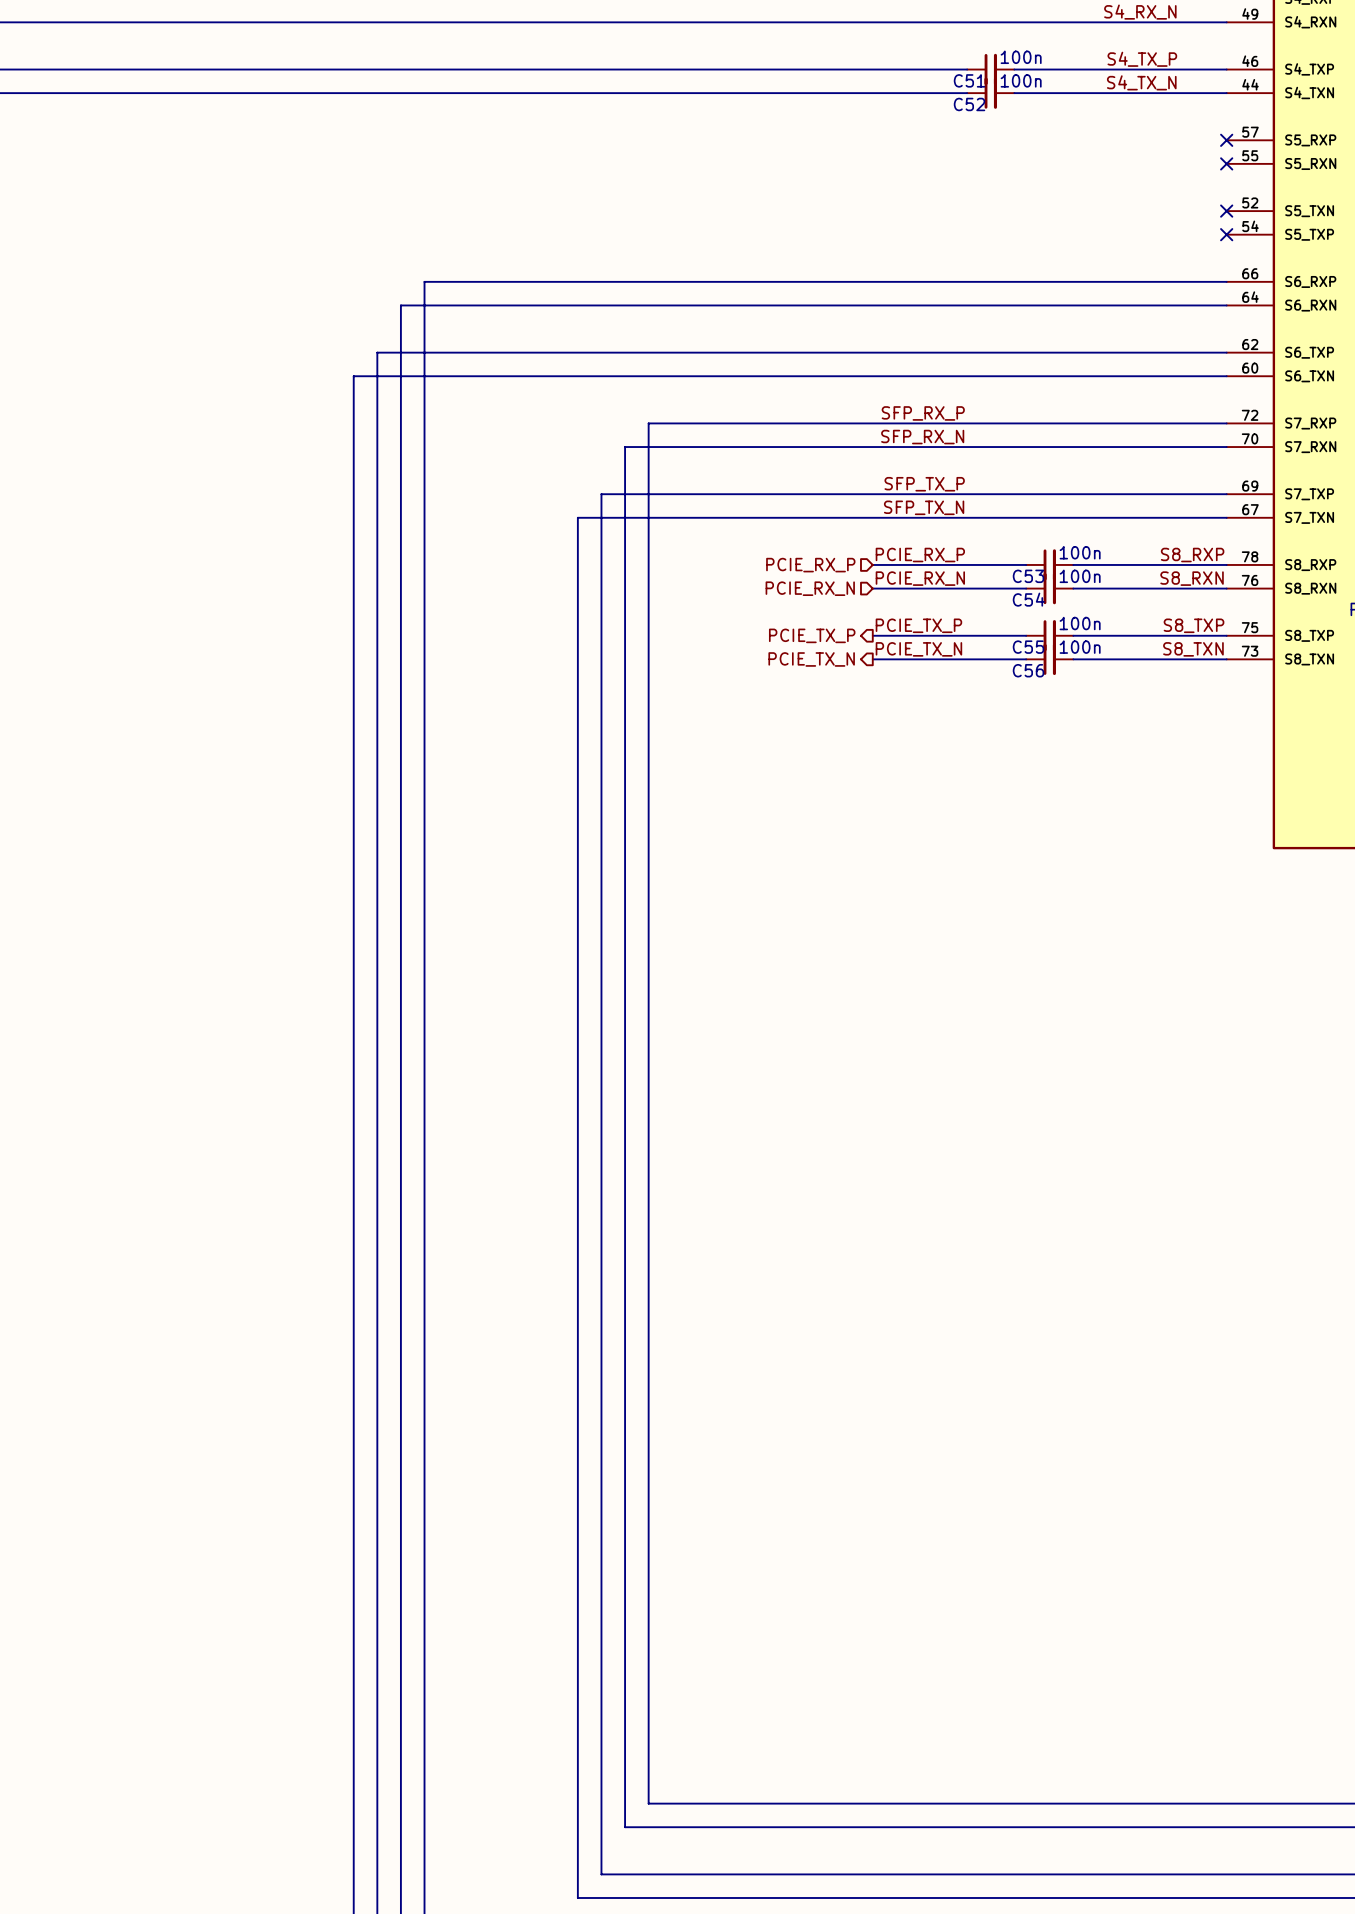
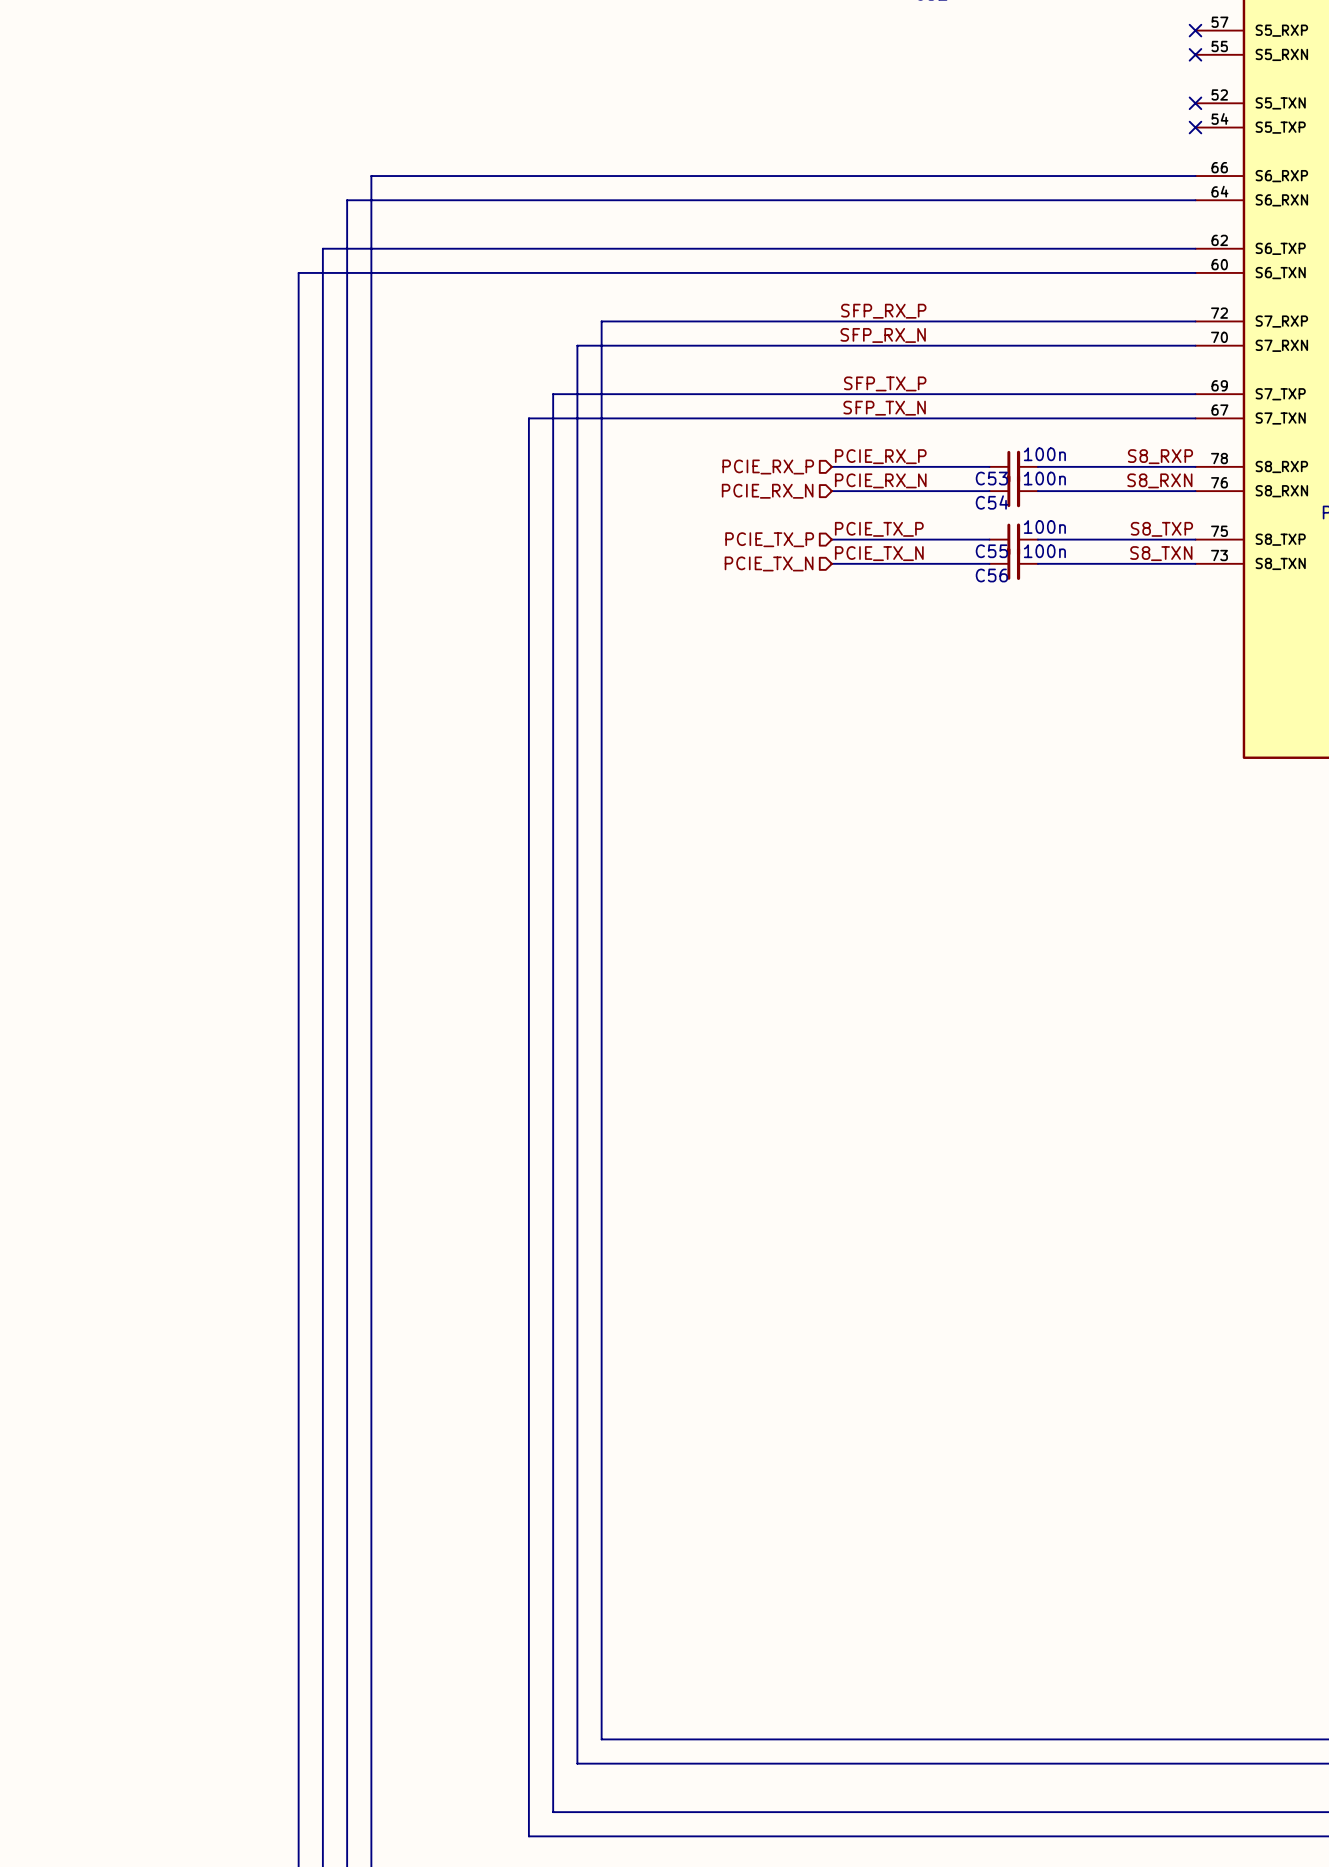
hierarchical label shape: output (812, 635) -> input (769, 539)
hierarchical label shape: output (811, 659) -> input (769, 563)

